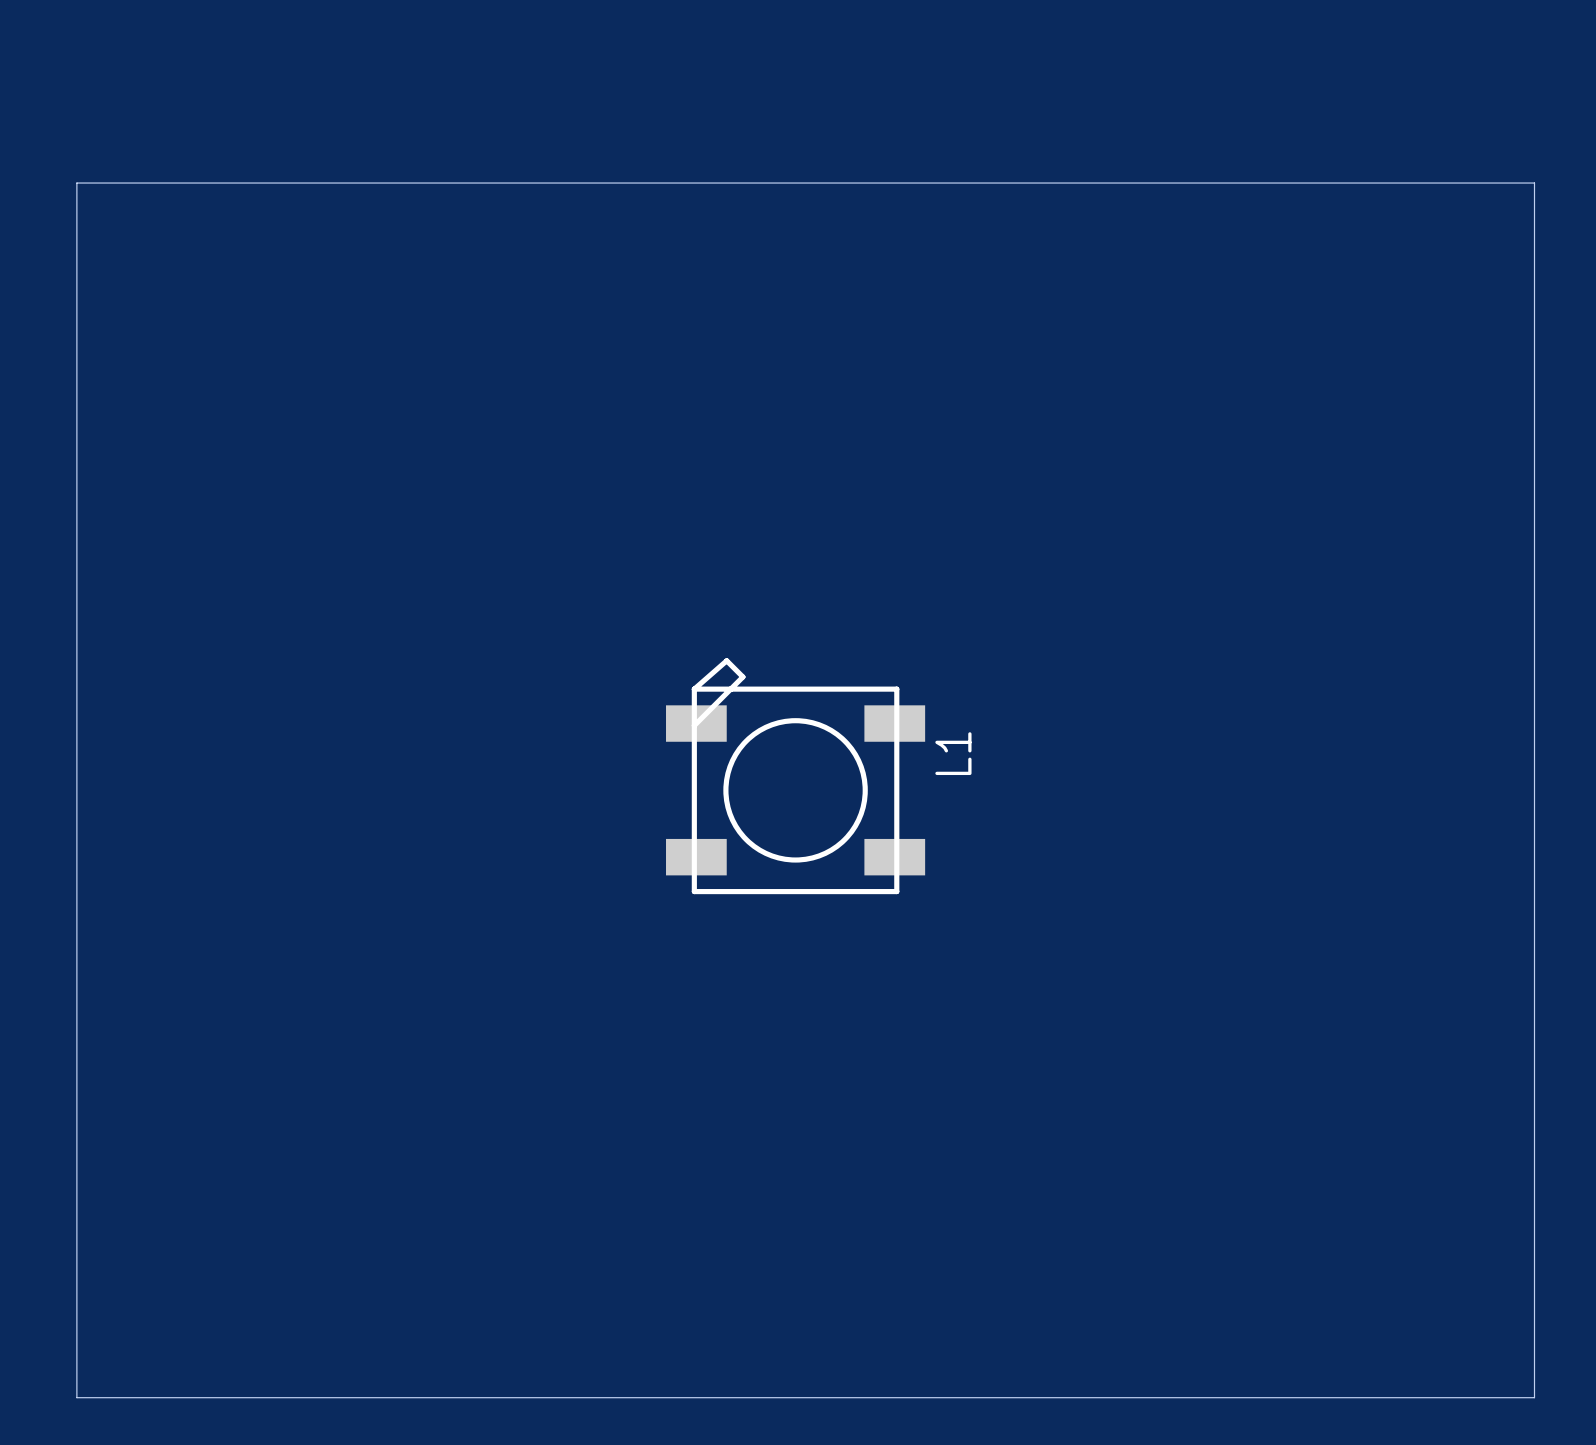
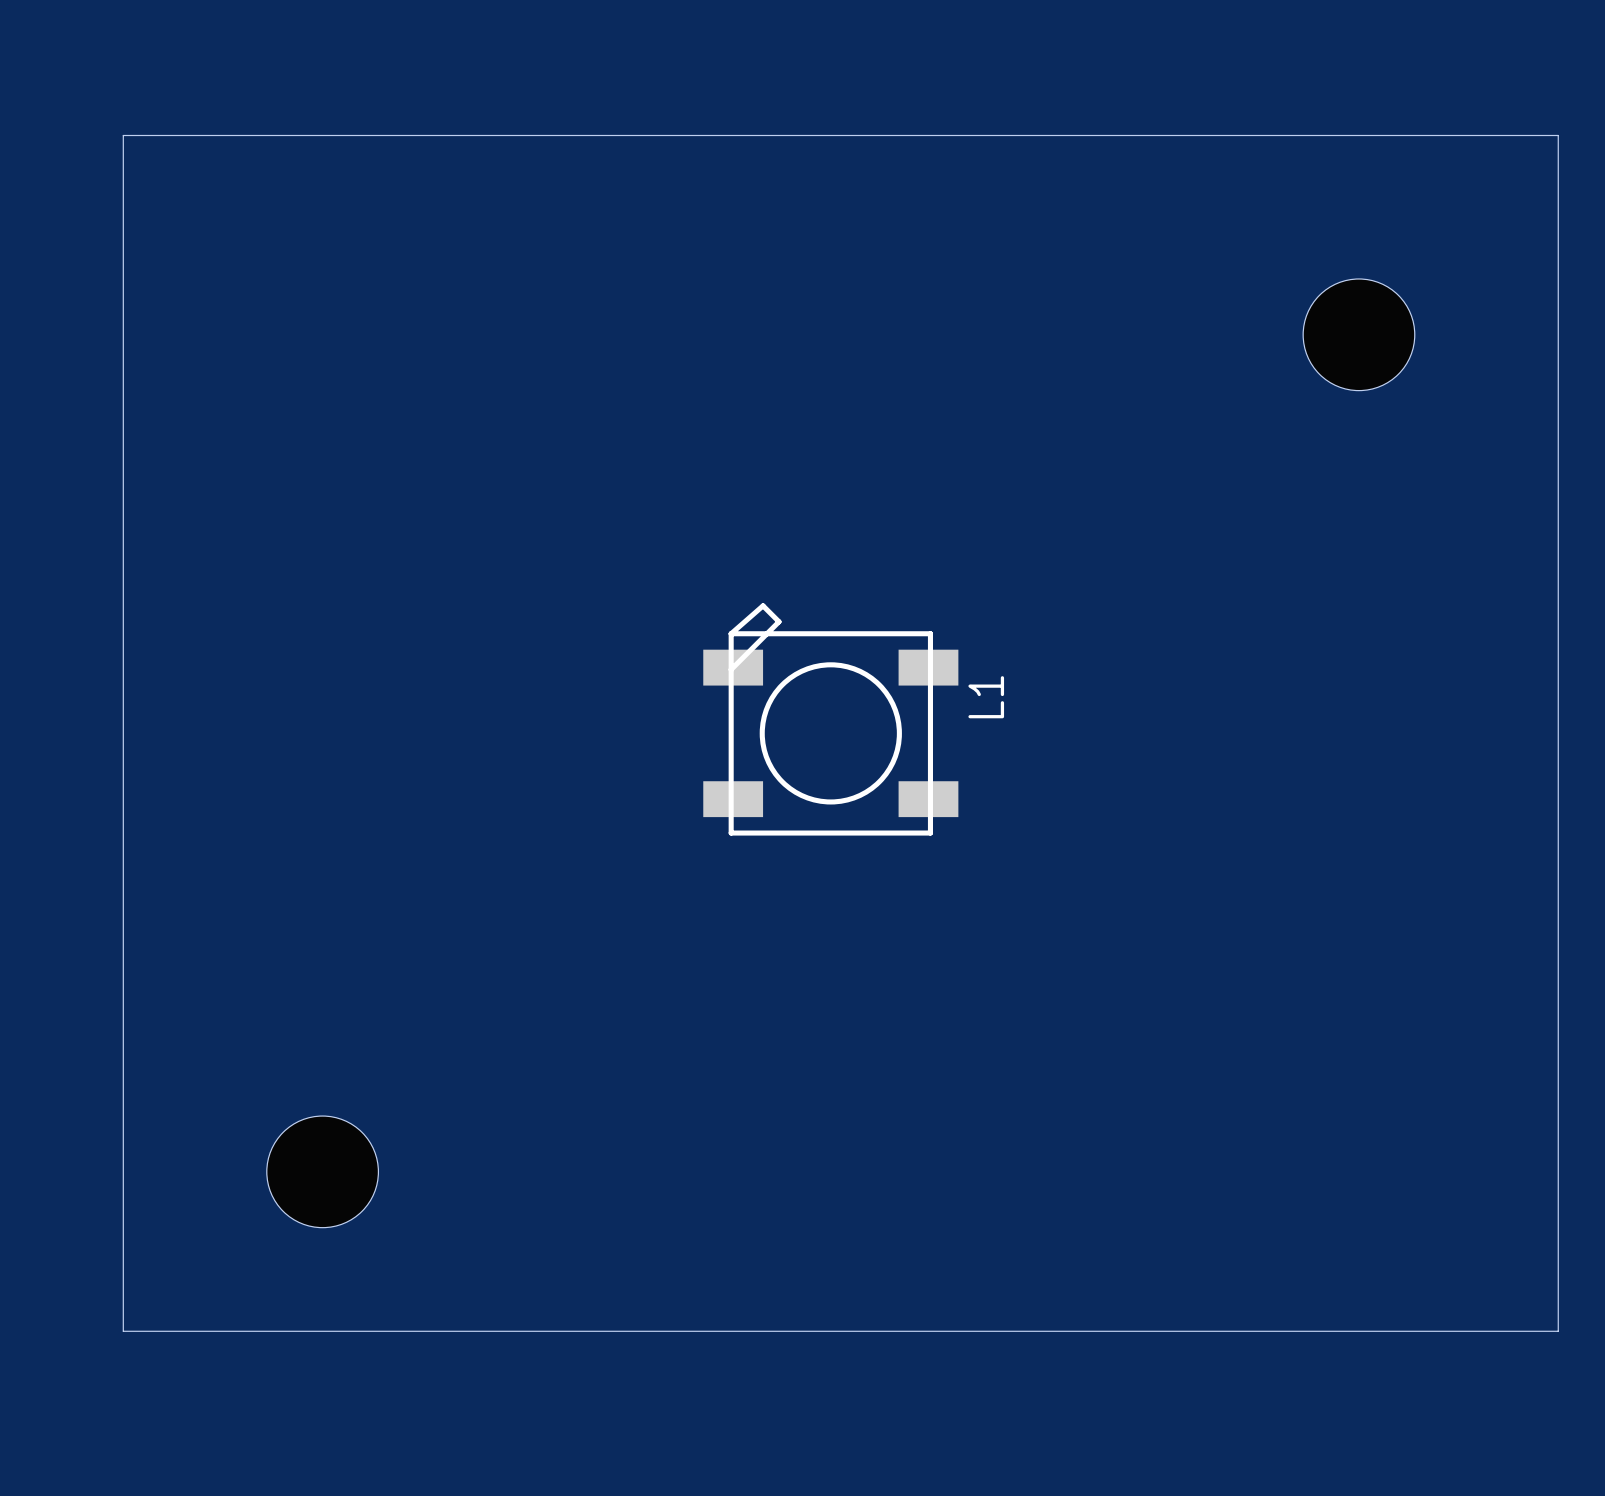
hole: none -> (1358, 334)
hole: none -> (322, 1171)

